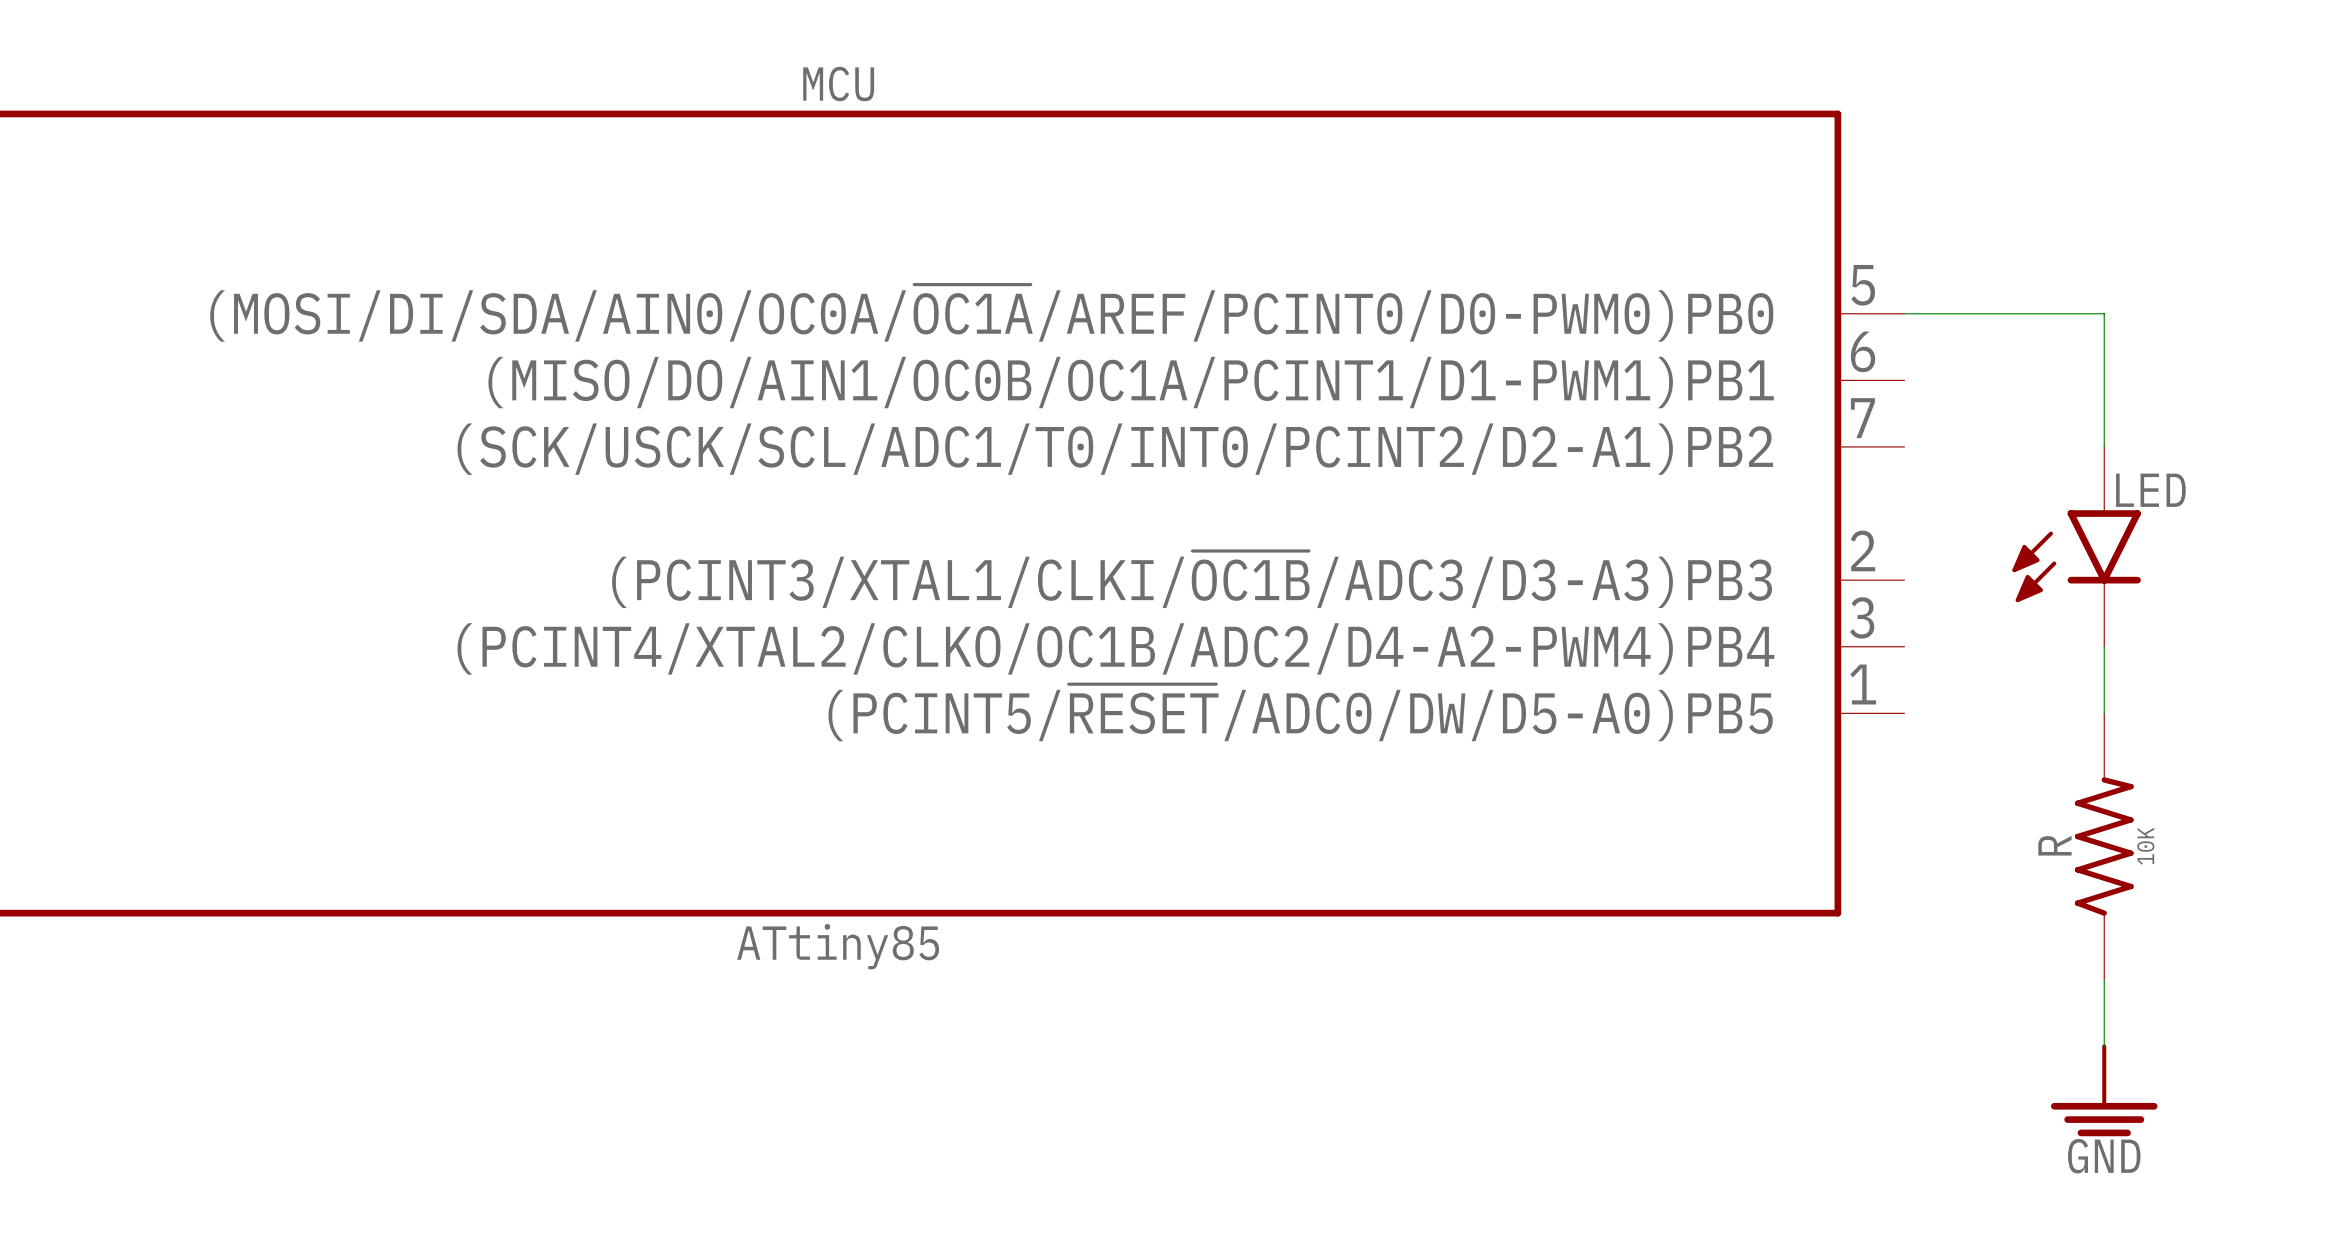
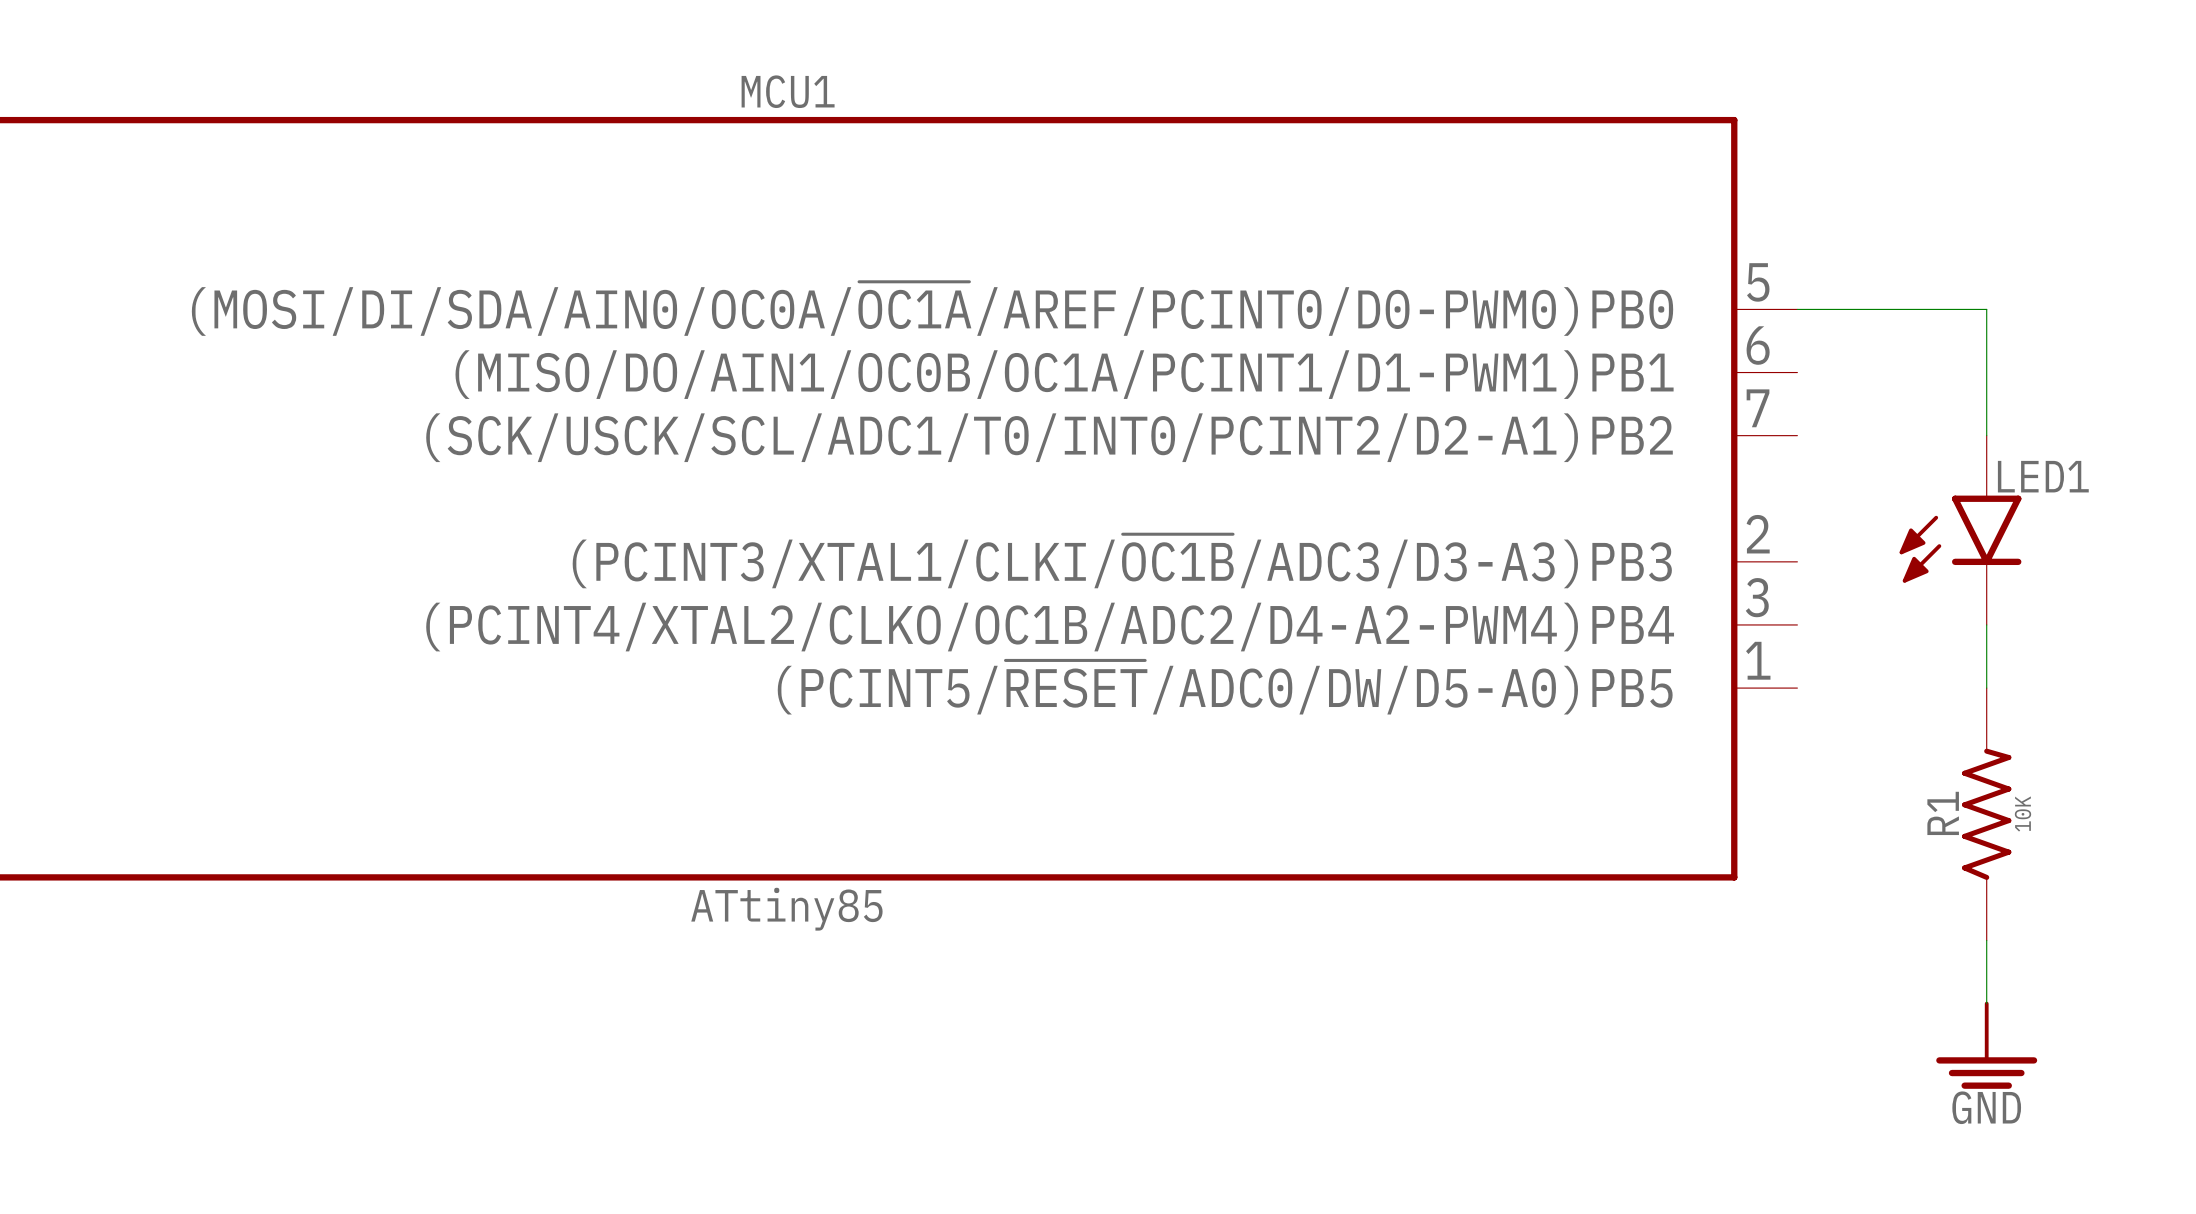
MCU name: MCU (838, 84) -> MCU1 (788, 91)
LED name: LED (2150, 490) -> LED1 (2043, 476)
R: 10K (2104, 846) -> none
R1: none -> 10K (1986, 814)

